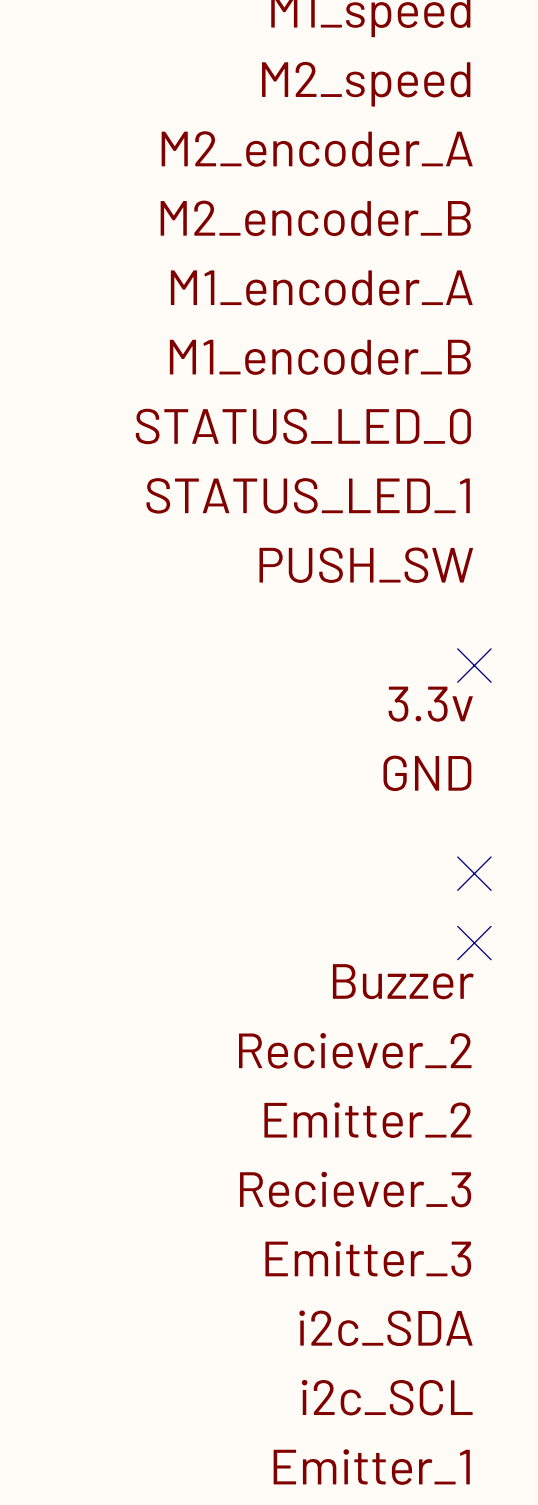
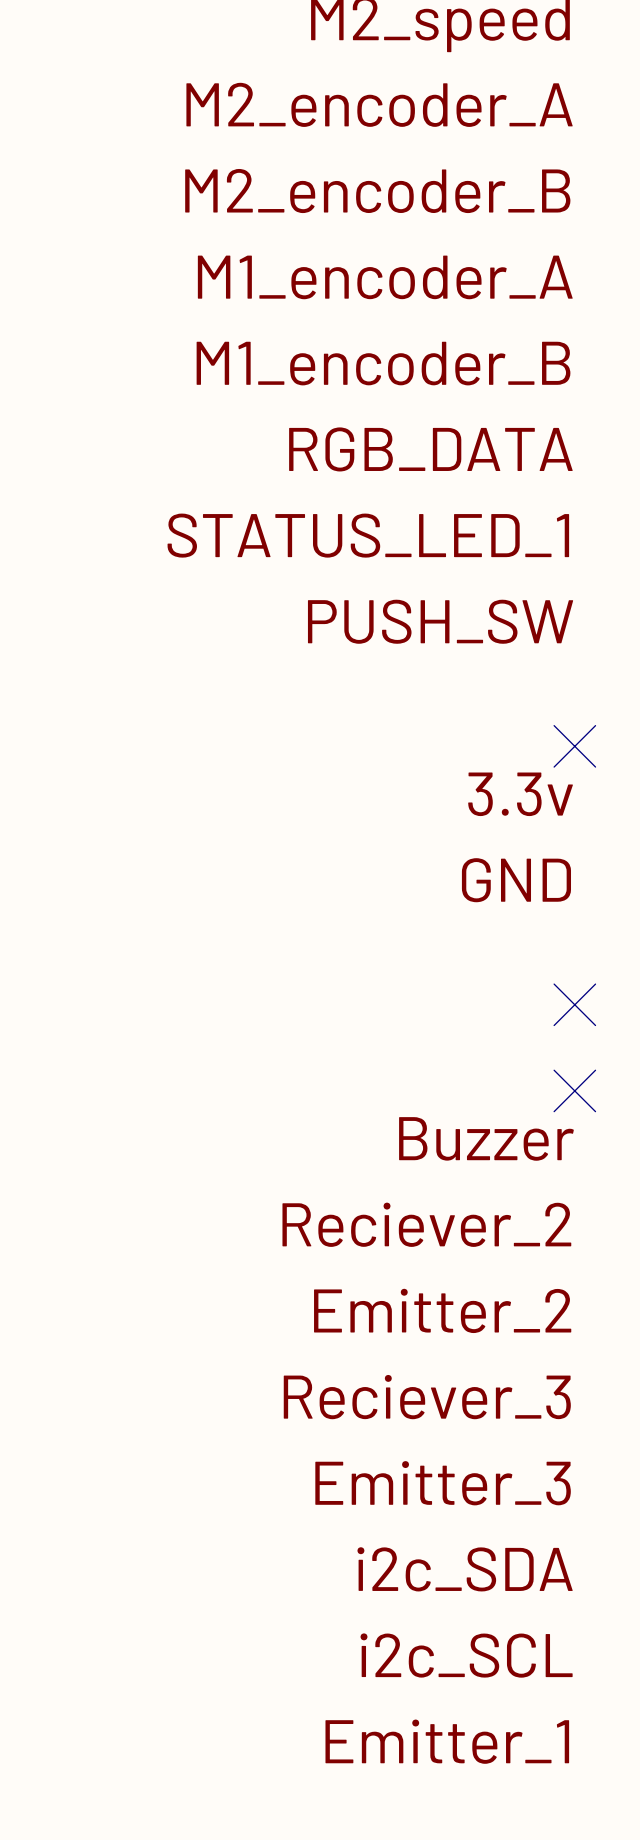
label: STATUS_LED_0 (303, 426) -> RGB_DATA (430, 449)

